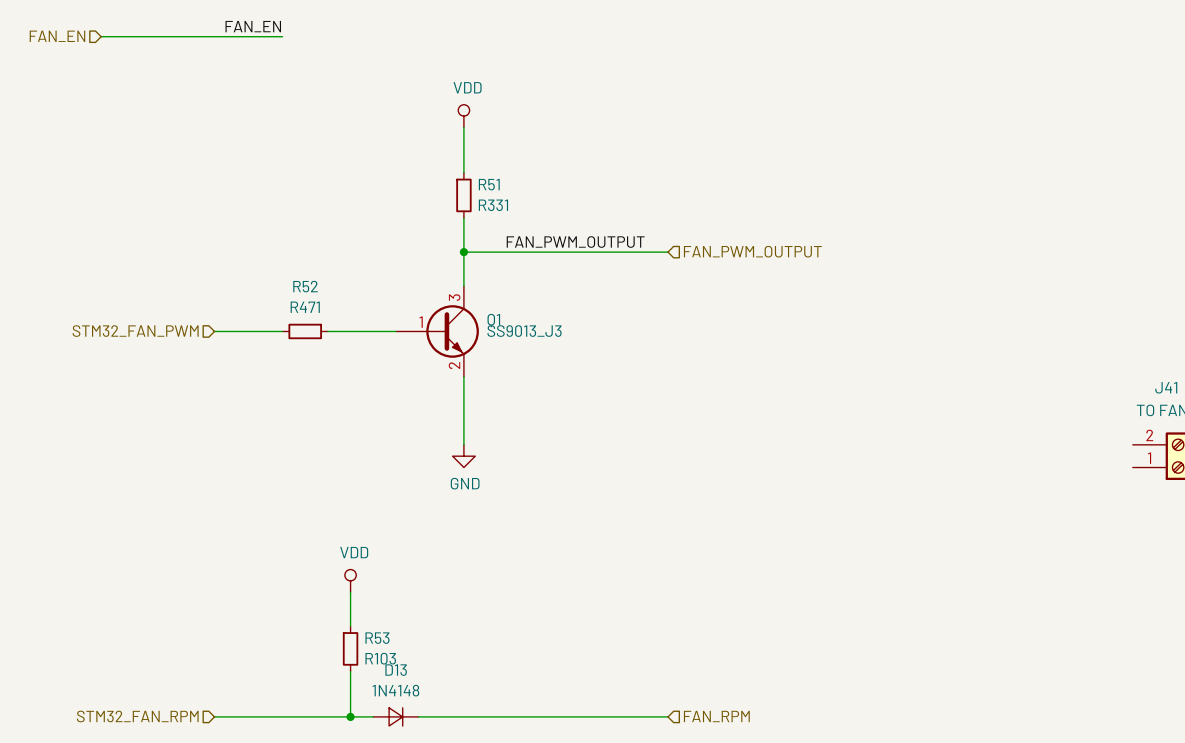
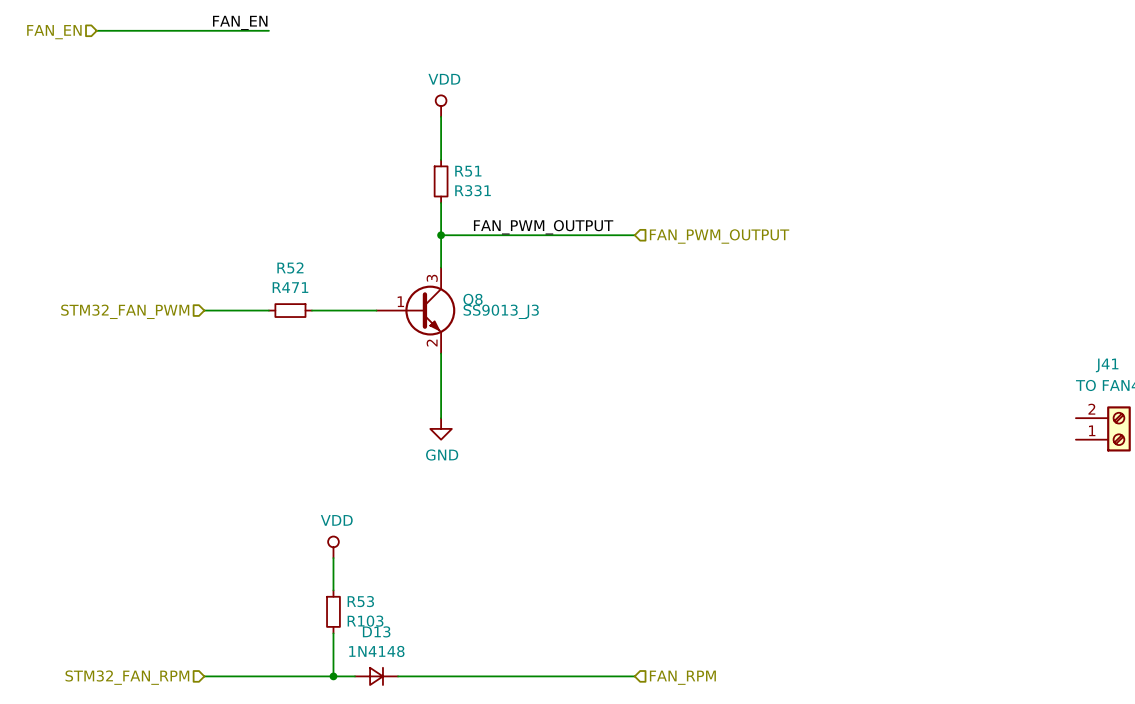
Q1 name: Q1 (493, 320) -> Q8 (473, 300)

